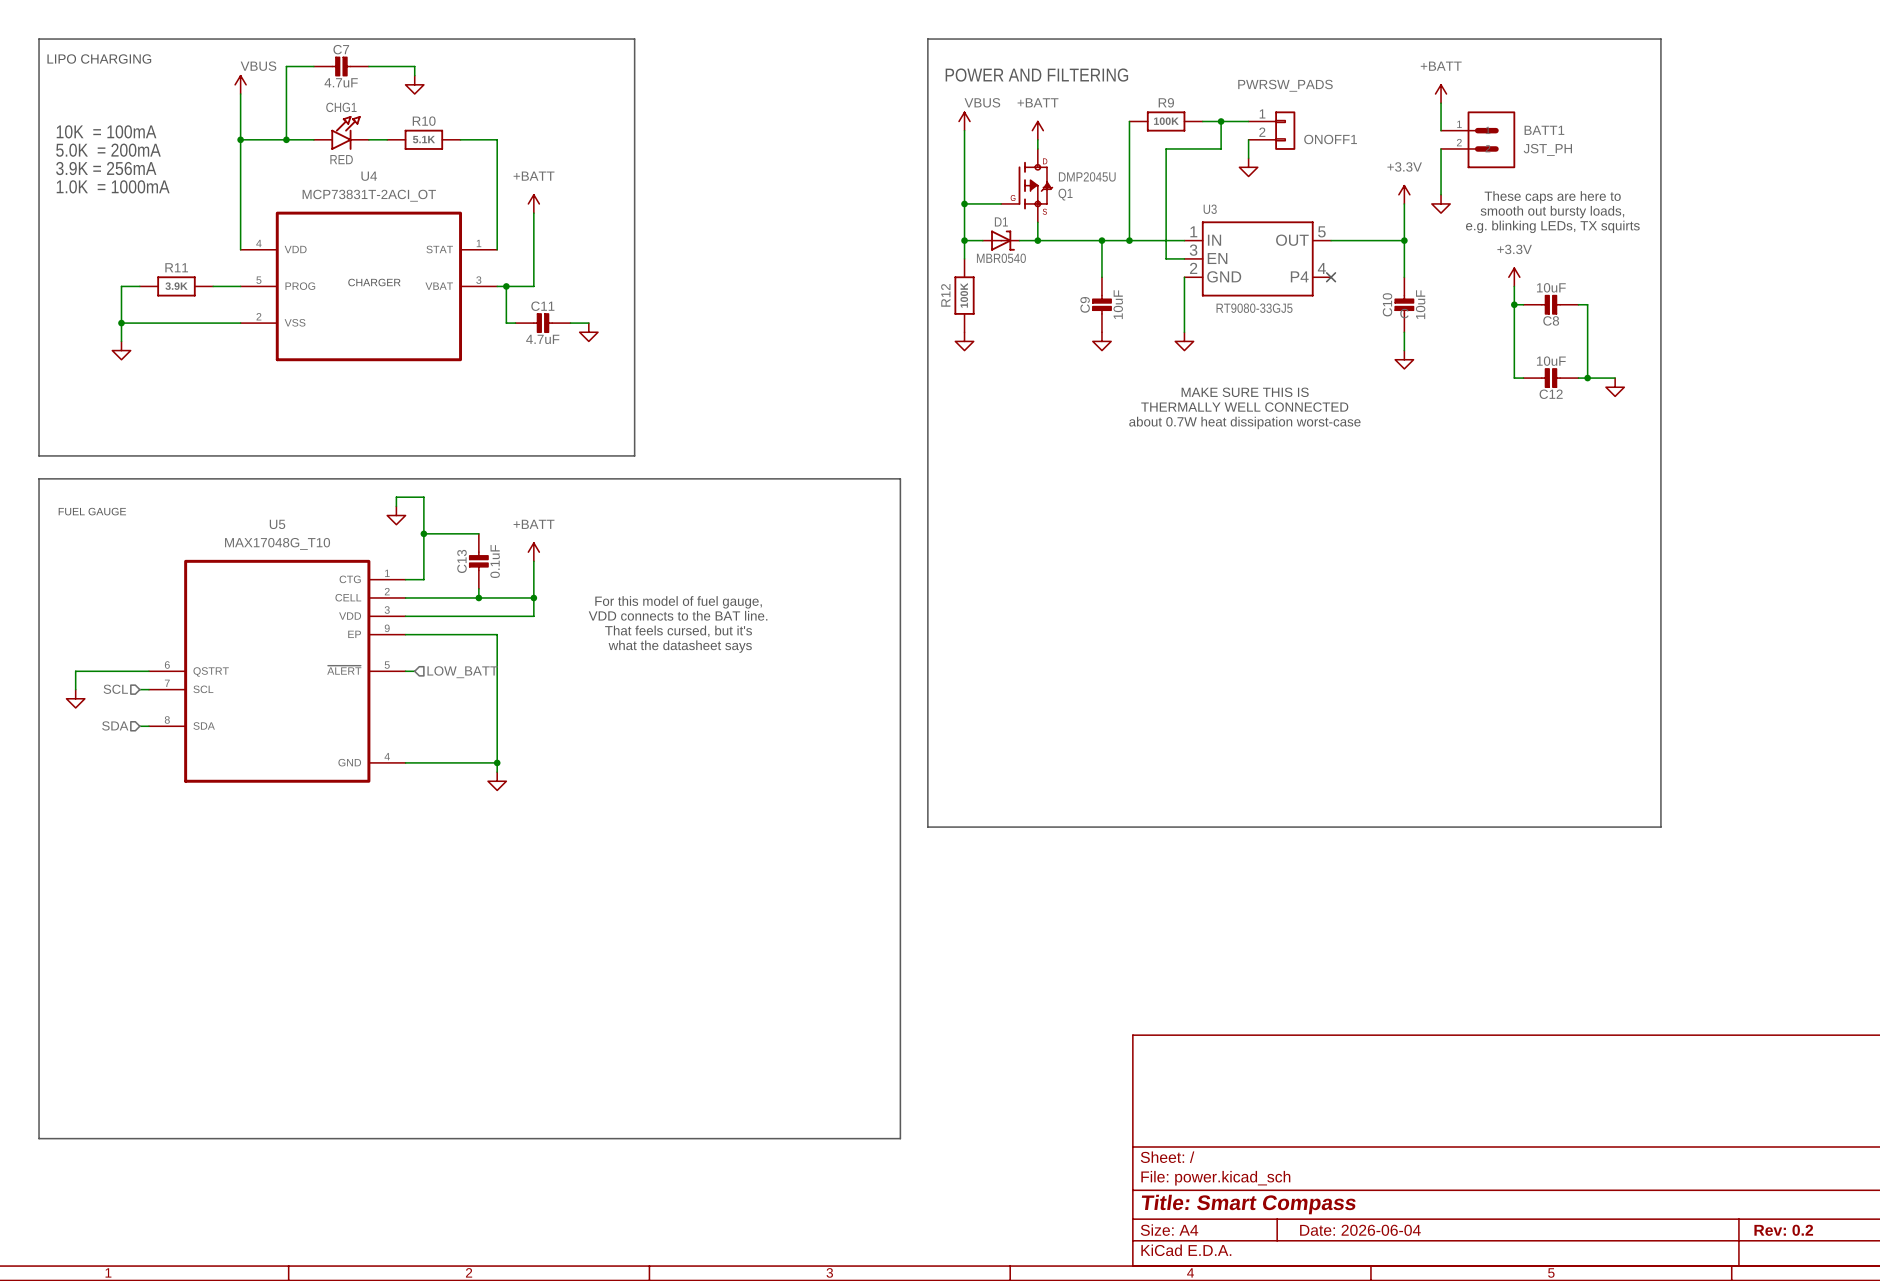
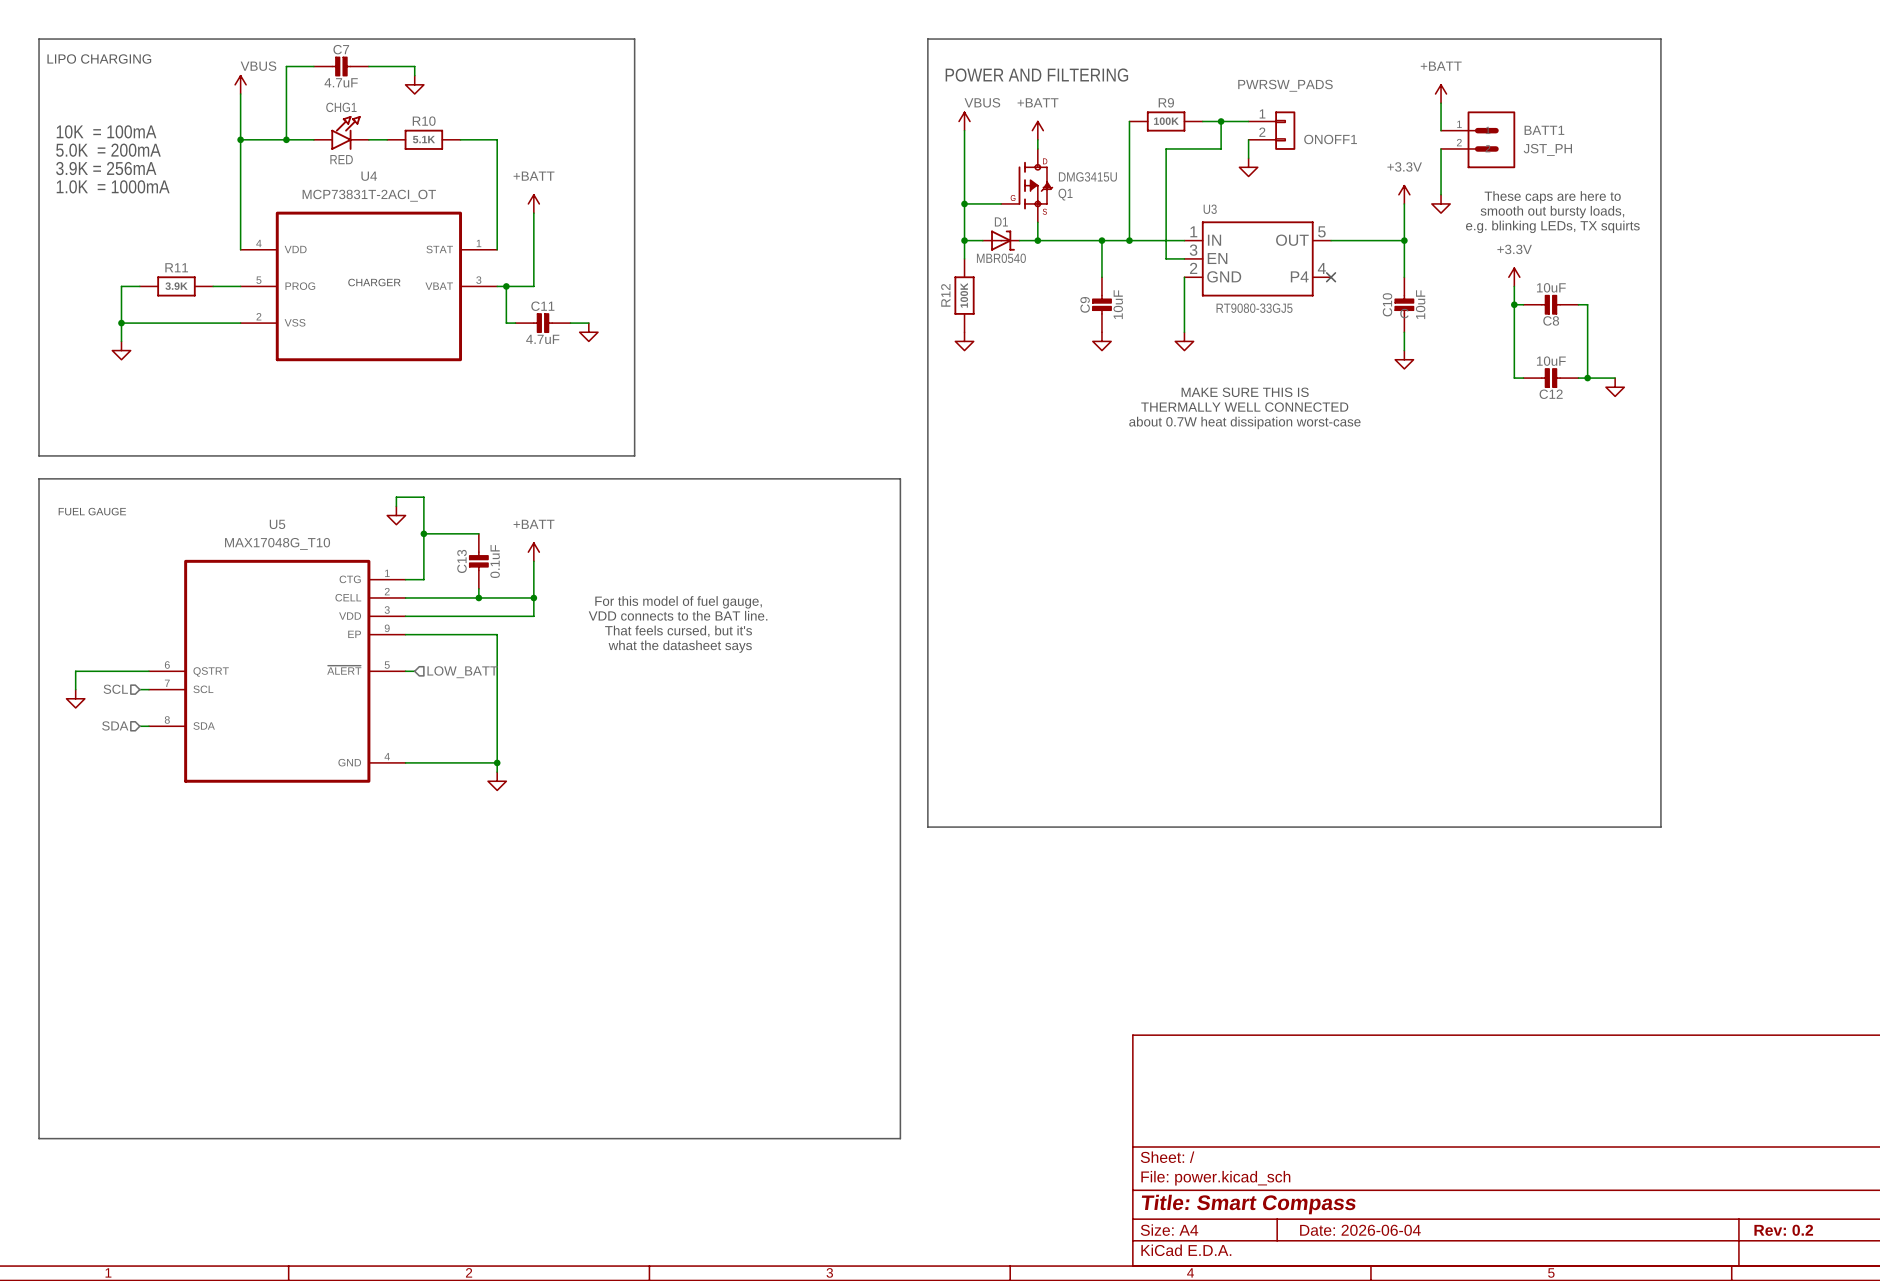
Q1 value: DMP2045U (1087, 176) -> DMG3415U (1087, 176)

